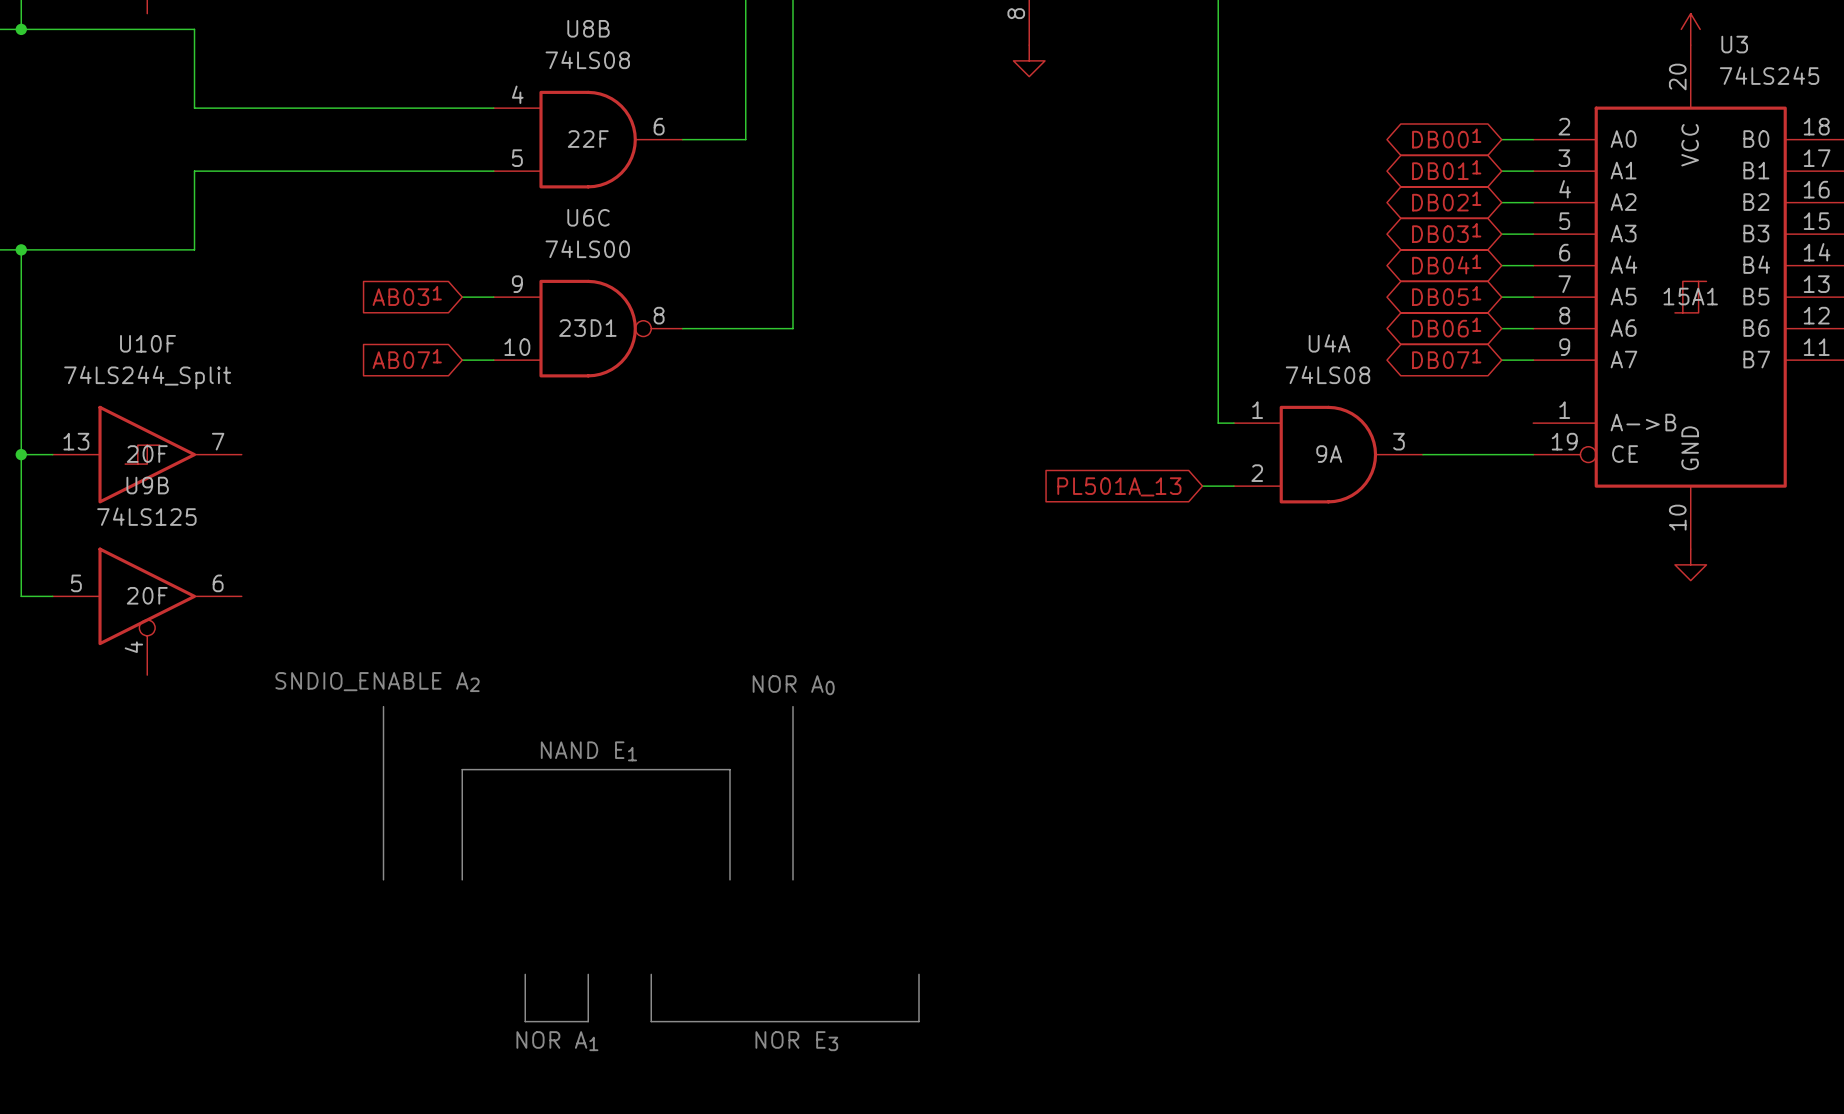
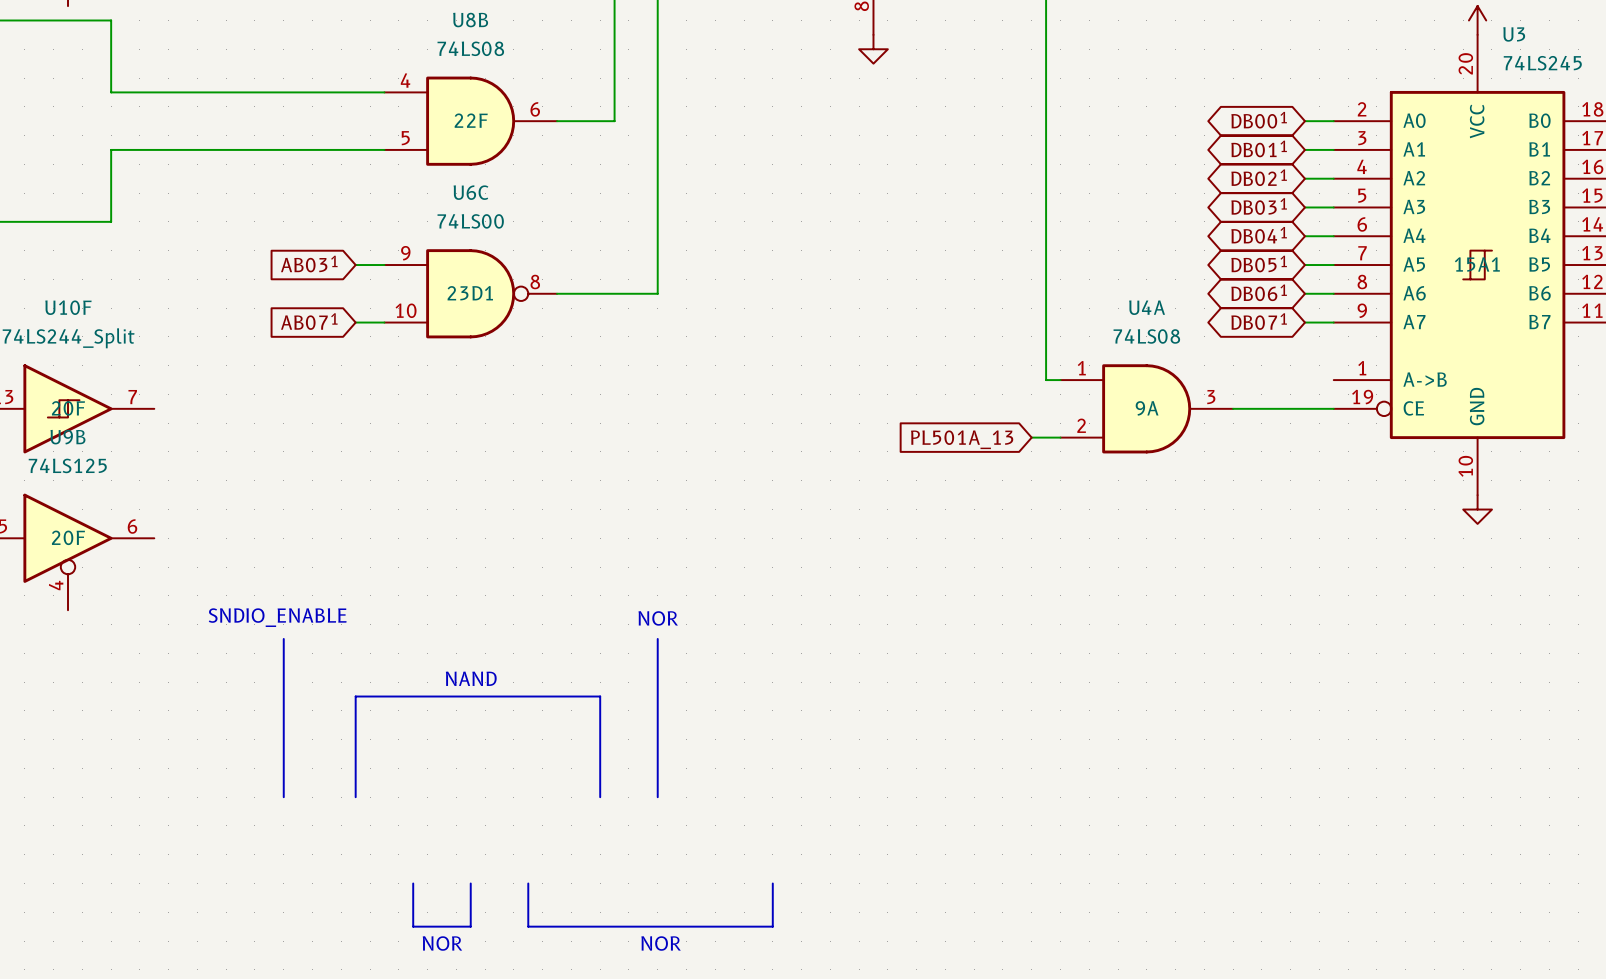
text: SNDIO_ENABLE A2 (377, 682) -> SNDIO_ENABLE (277, 617)
text: NOR A0 (793, 685) -> NOR (658, 618)
text: NAND E1 (588, 751) -> NAND (471, 678)
text: NOR A1 (557, 1041) -> NOR (442, 943)
text: NOR E3 (796, 1041) -> NOR (661, 943)

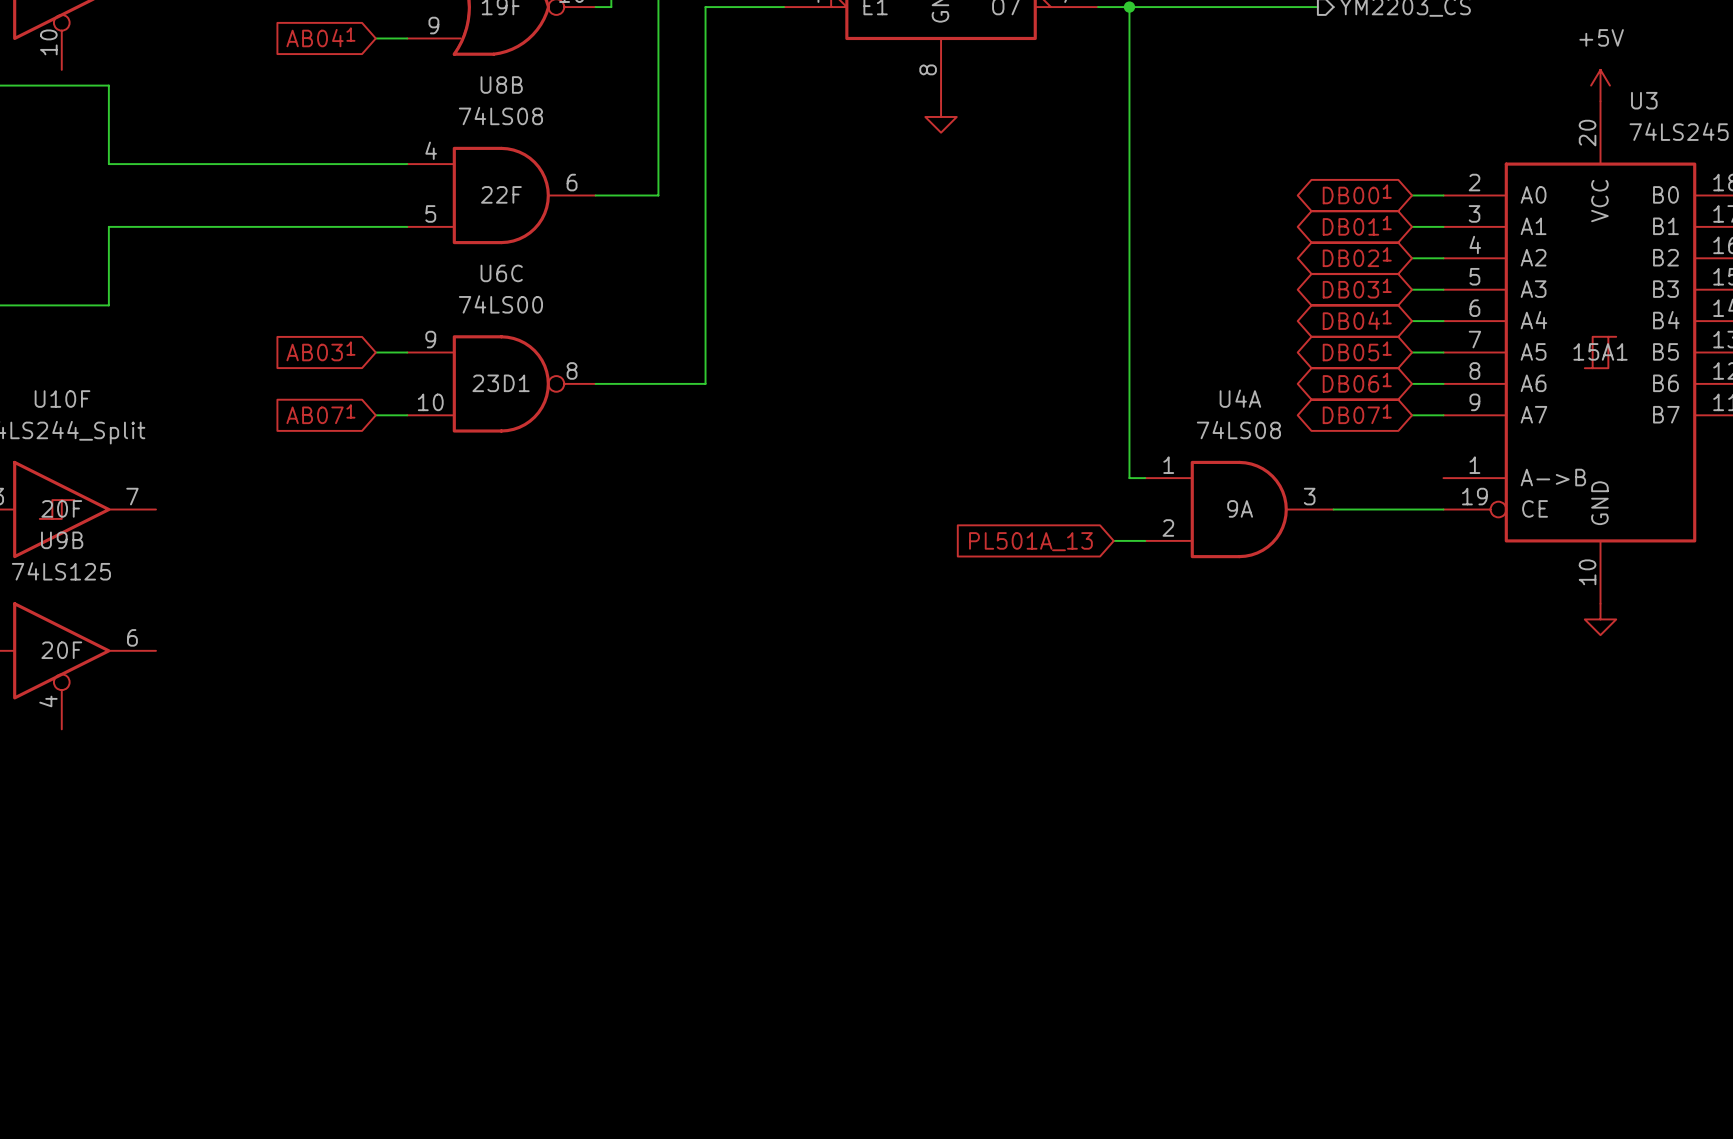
text: SNDIO_ENABLE (277, 617) -> none
text: NOR (658, 618) -> none
line: (283, 638) (283, 797) -> none
line: (657, 638) (657, 797) -> none
text: NAND (471, 678) -> none
line: (355, 797) (355, 696) (600, 696) (600, 797) -> none
line: (413, 883) (413, 926) (470, 926) (470, 883) -> none
line: (528, 883) (528, 926) (772, 926) (772, 883) -> none
text: NOR (442, 943) -> none
text: NOR (661, 943) -> none

